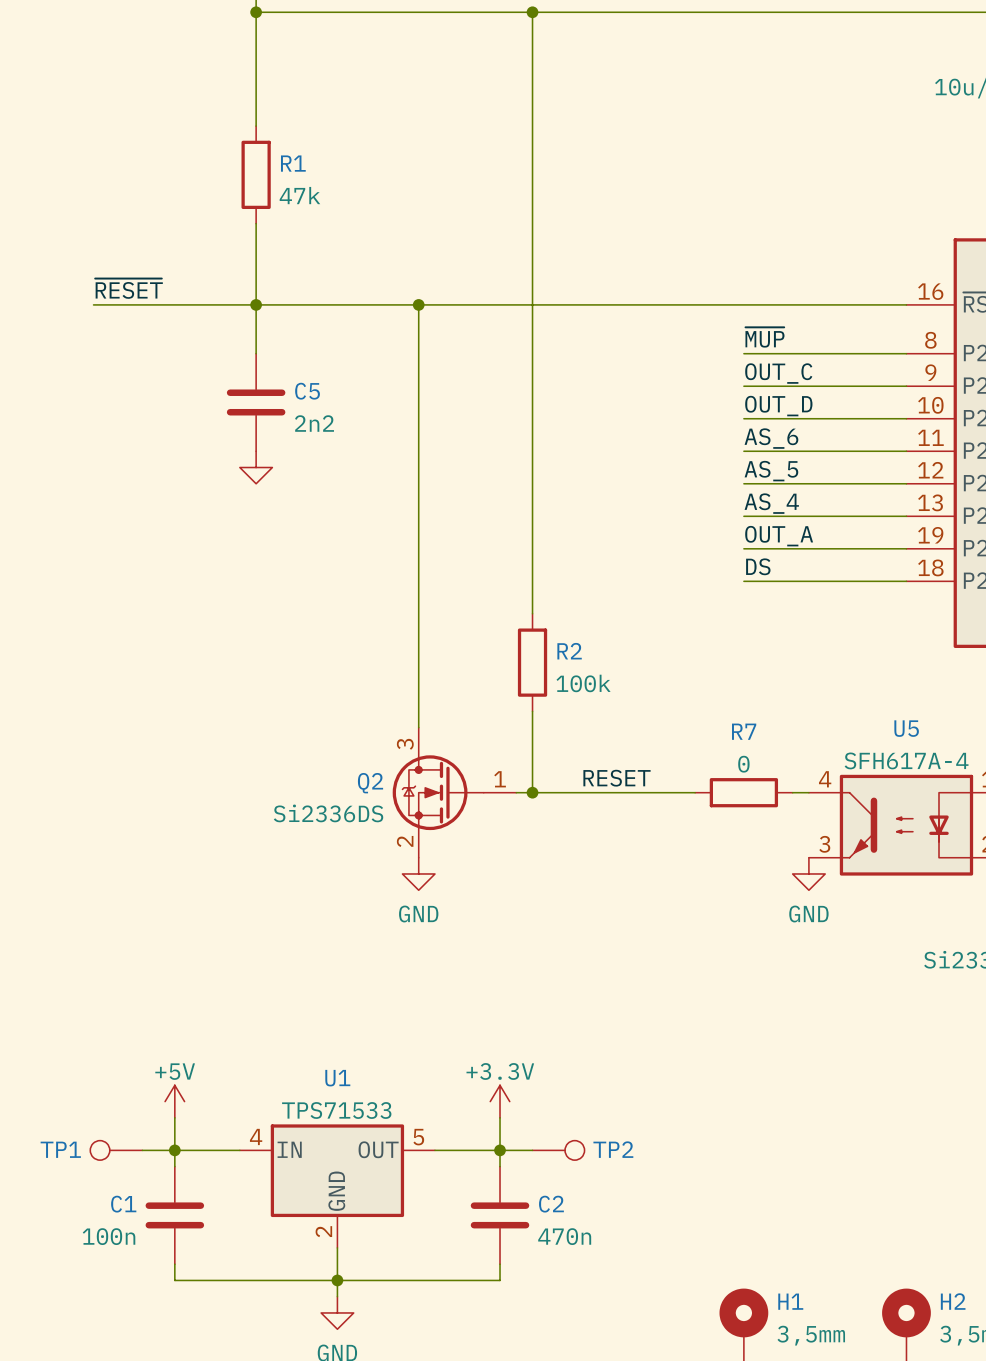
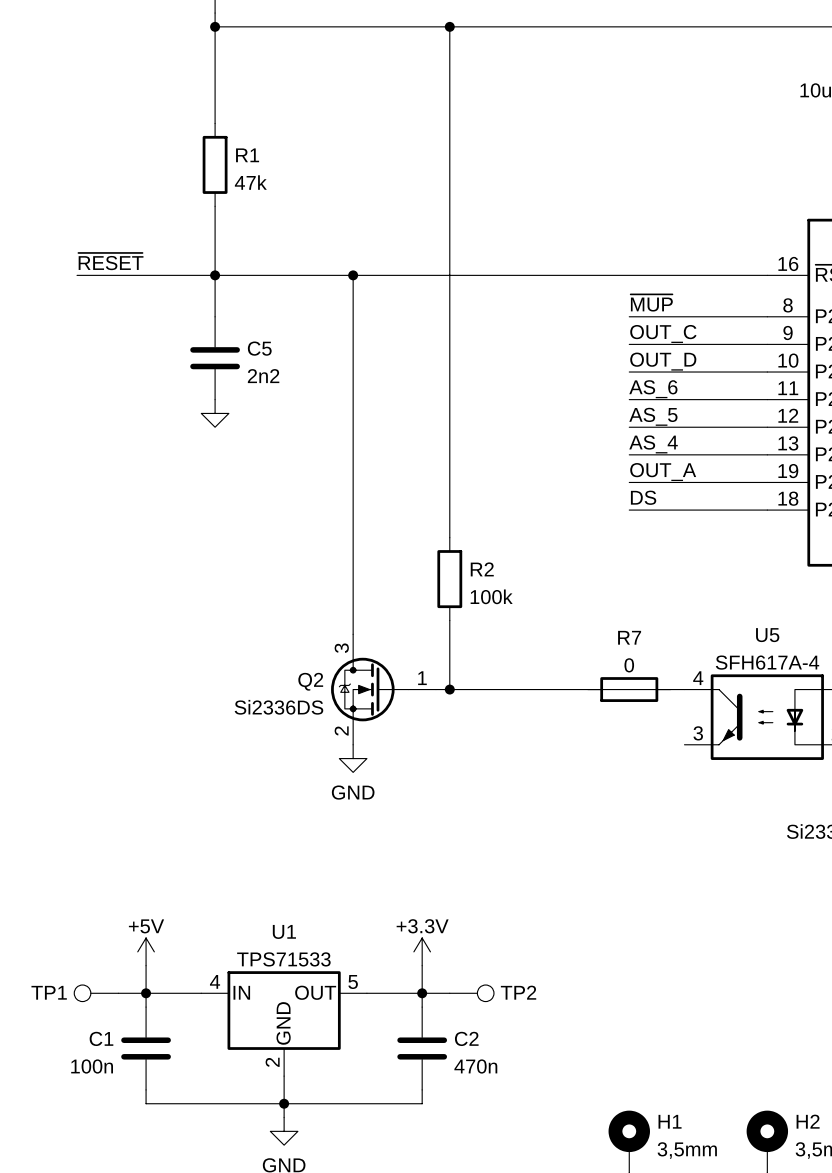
label: RESET (617, 778) -> none
wire: none -> (587, 689) (670, 689)
power symbol: GND (808, 873) -> none

